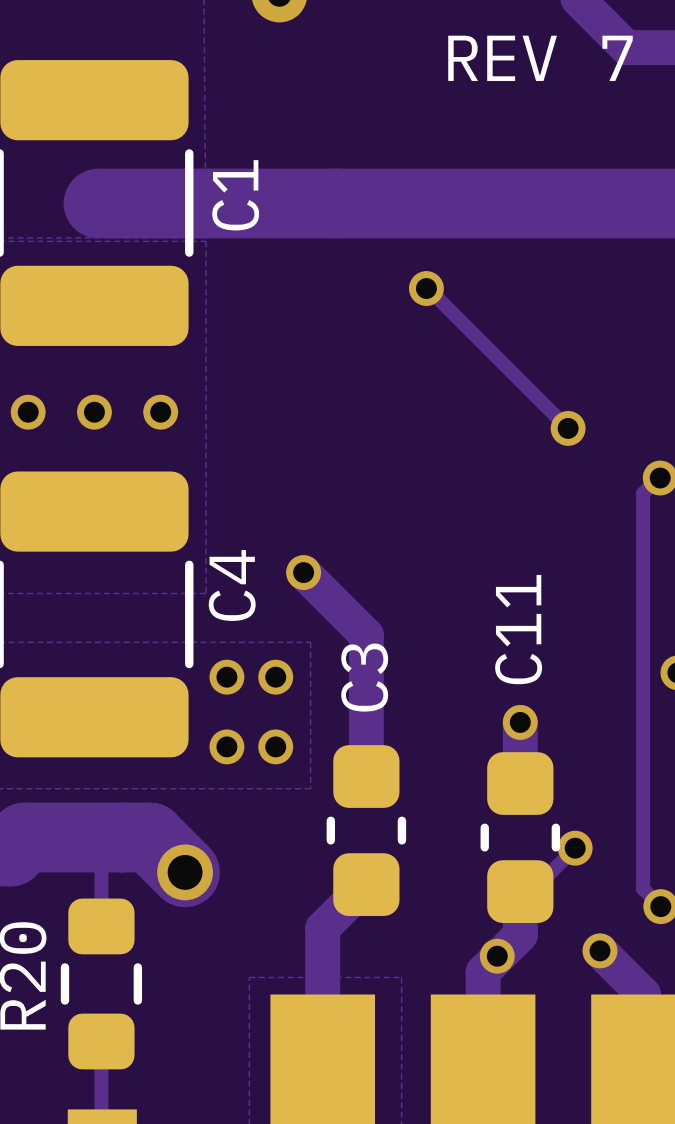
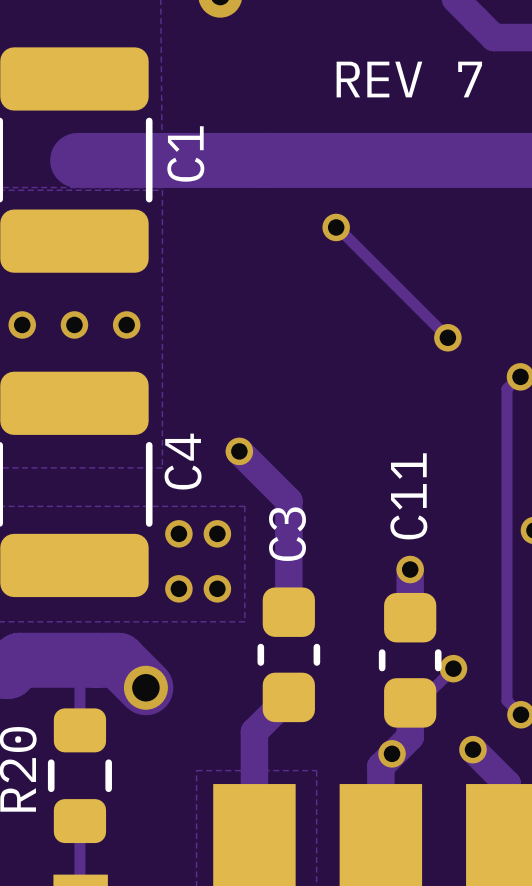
text position: REV 7 (540, 58) -> REV 7 (409, 79)

